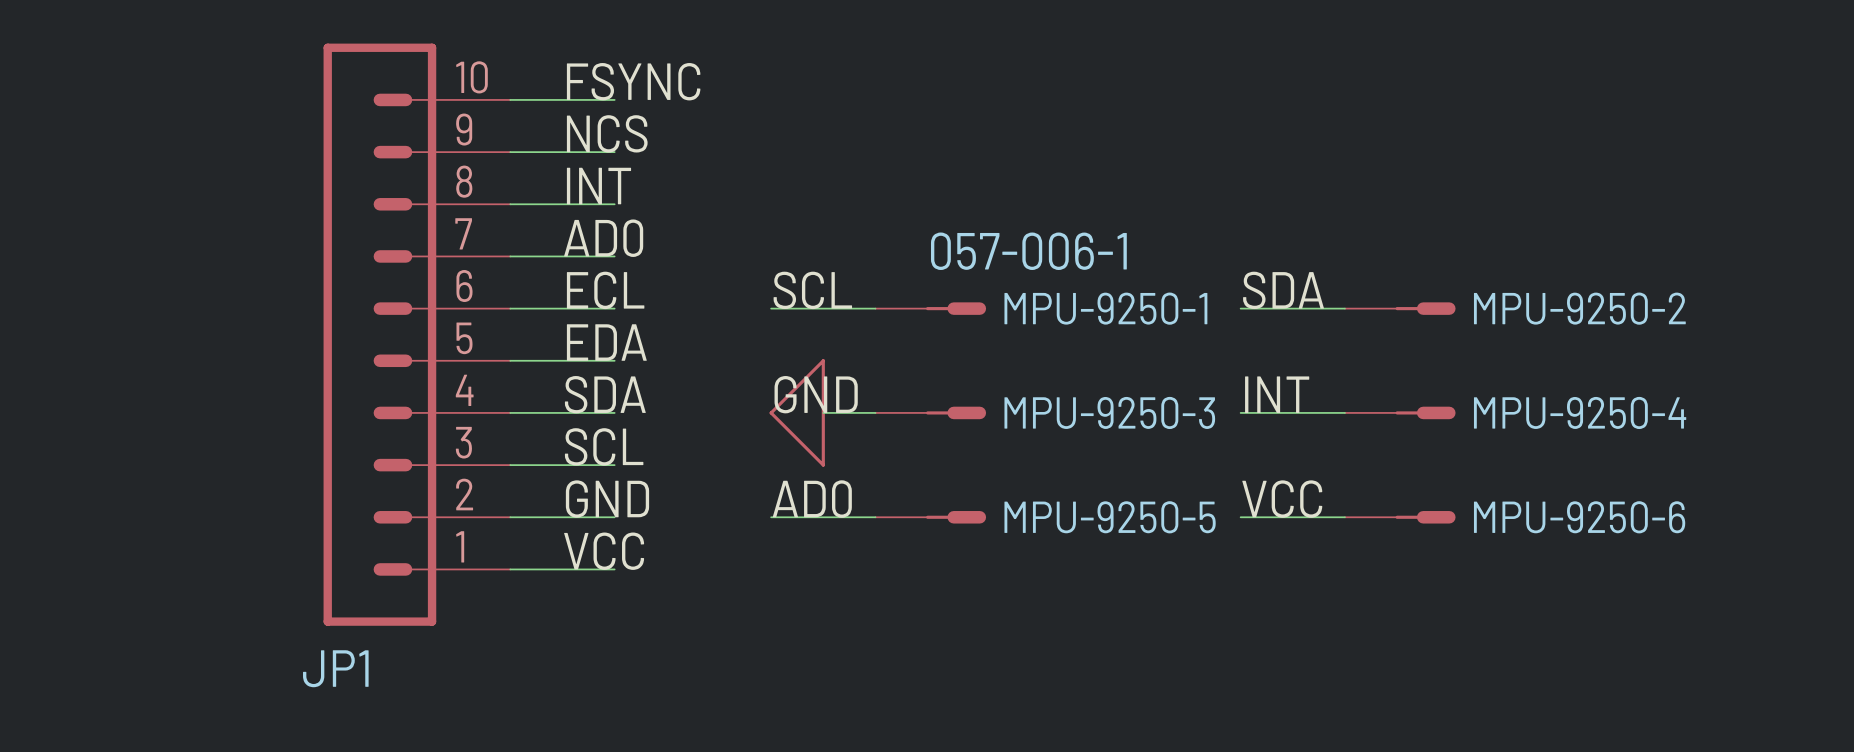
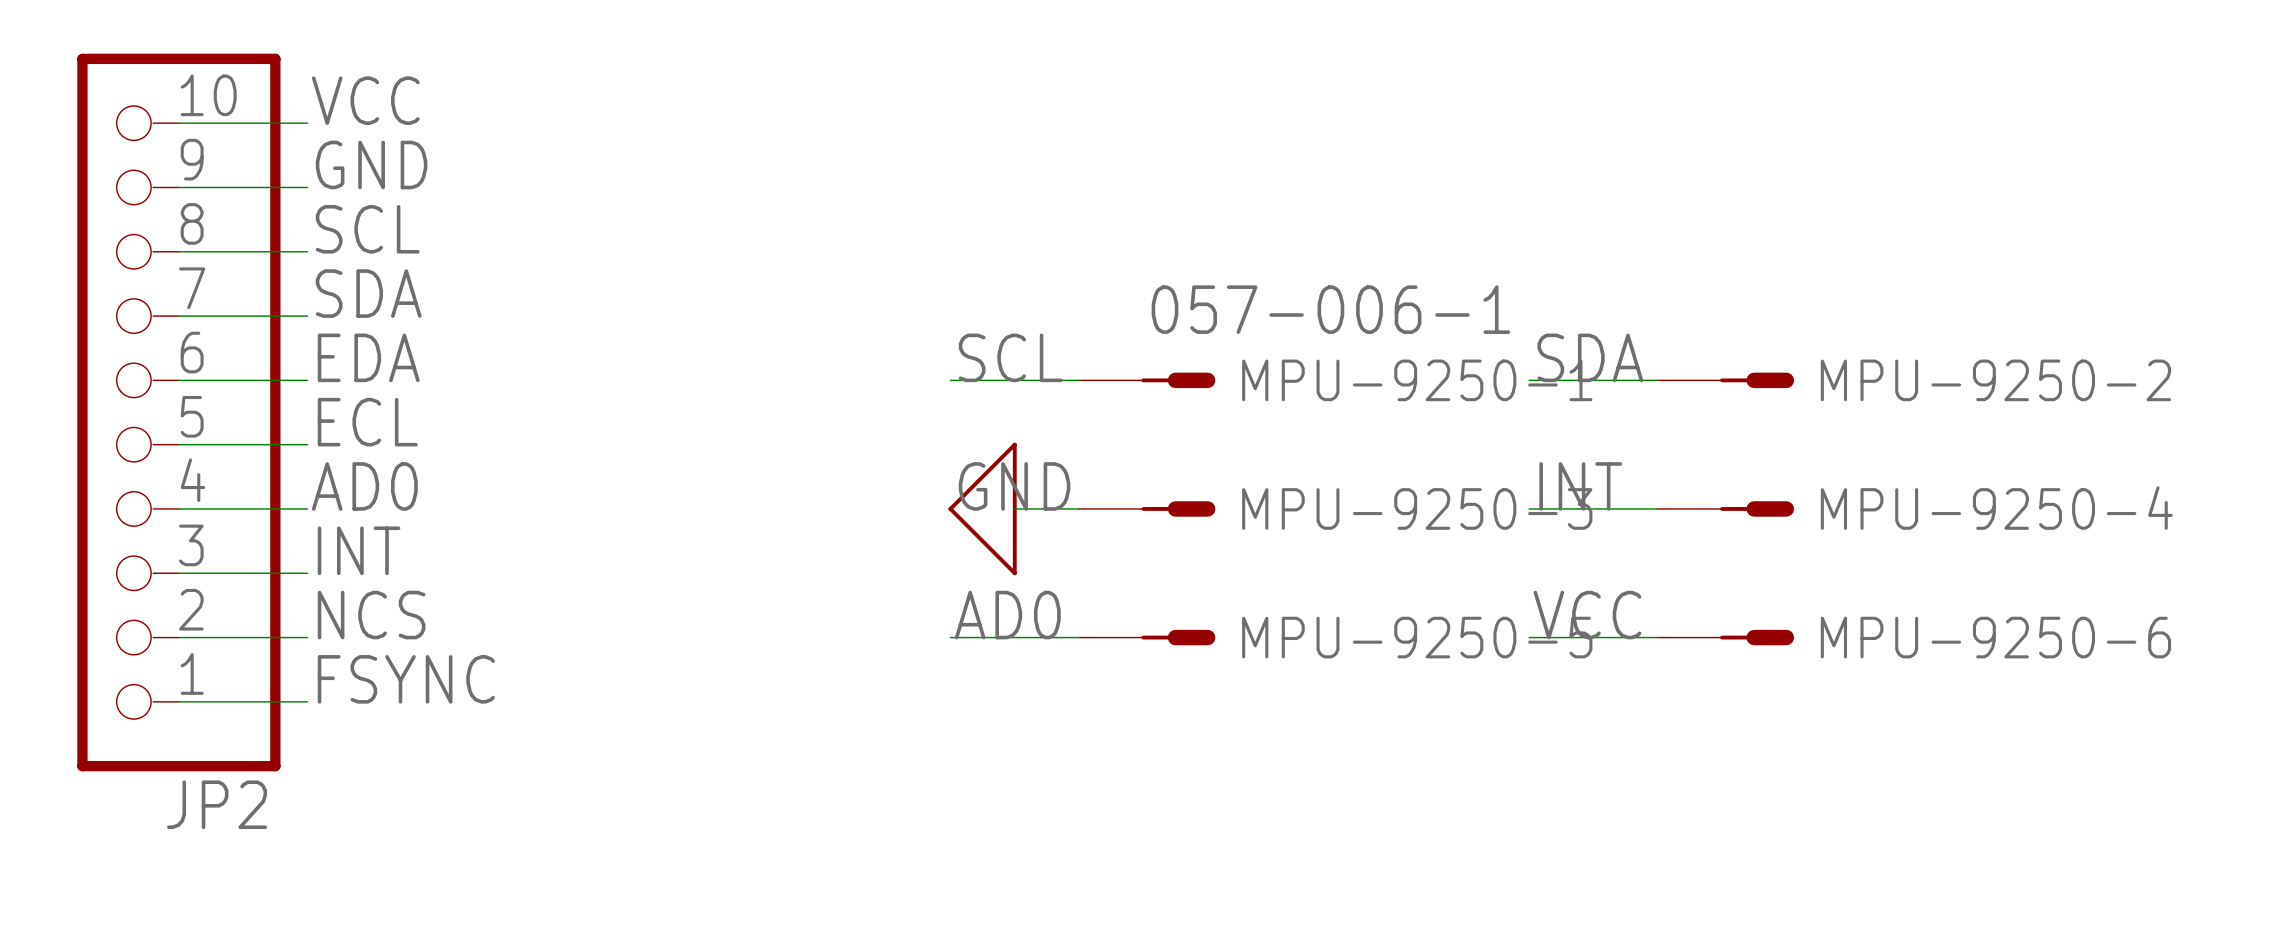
label: none -> VCC (365, 100)
label: FSYNC (633, 81) -> none
wire: (510, 99) (614, 99) -> (178, 123) (307, 123)
label position: NCS (607, 133) -> NCS (371, 615)
wire: (510, 152) (614, 152) -> (178, 187) (307, 187)
label position: INT (598, 186) -> INT (359, 550)
wire: (510, 204) (614, 204) -> (178, 251) (307, 251)
label position: AD0 (603, 238) -> AD0 (364, 486)
wire: (510, 256) (614, 256) -> (178, 316) (307, 316)
label position: ECL (605, 290) -> ECL (367, 422)
wire: (510, 308) (614, 308) -> (178, 380) (307, 380)
JP2: none -> (178, 412)
JP1: (416, 334) -> none
label position: EDA (606, 342) -> EDA (368, 357)
wire: (510, 360) (614, 360) -> (178, 444) (307, 444)
label position: SDA (605, 394) -> SDA (368, 293)
wire: (510, 412) (614, 412) -> (178, 508) (307, 508)
label position: SCL (604, 446) -> SCL (367, 229)
wire: (510, 465) (614, 465) -> (178, 573) (307, 573)
label position: GND (607, 499) -> GND (371, 164)
wire: (510, 517) (614, 517) -> (178, 637) (307, 637)
label: none -> FSYNC (406, 679)
label: VCC (604, 551) -> none
wire: (510, 569) (614, 569) -> (178, 701) (307, 701)

